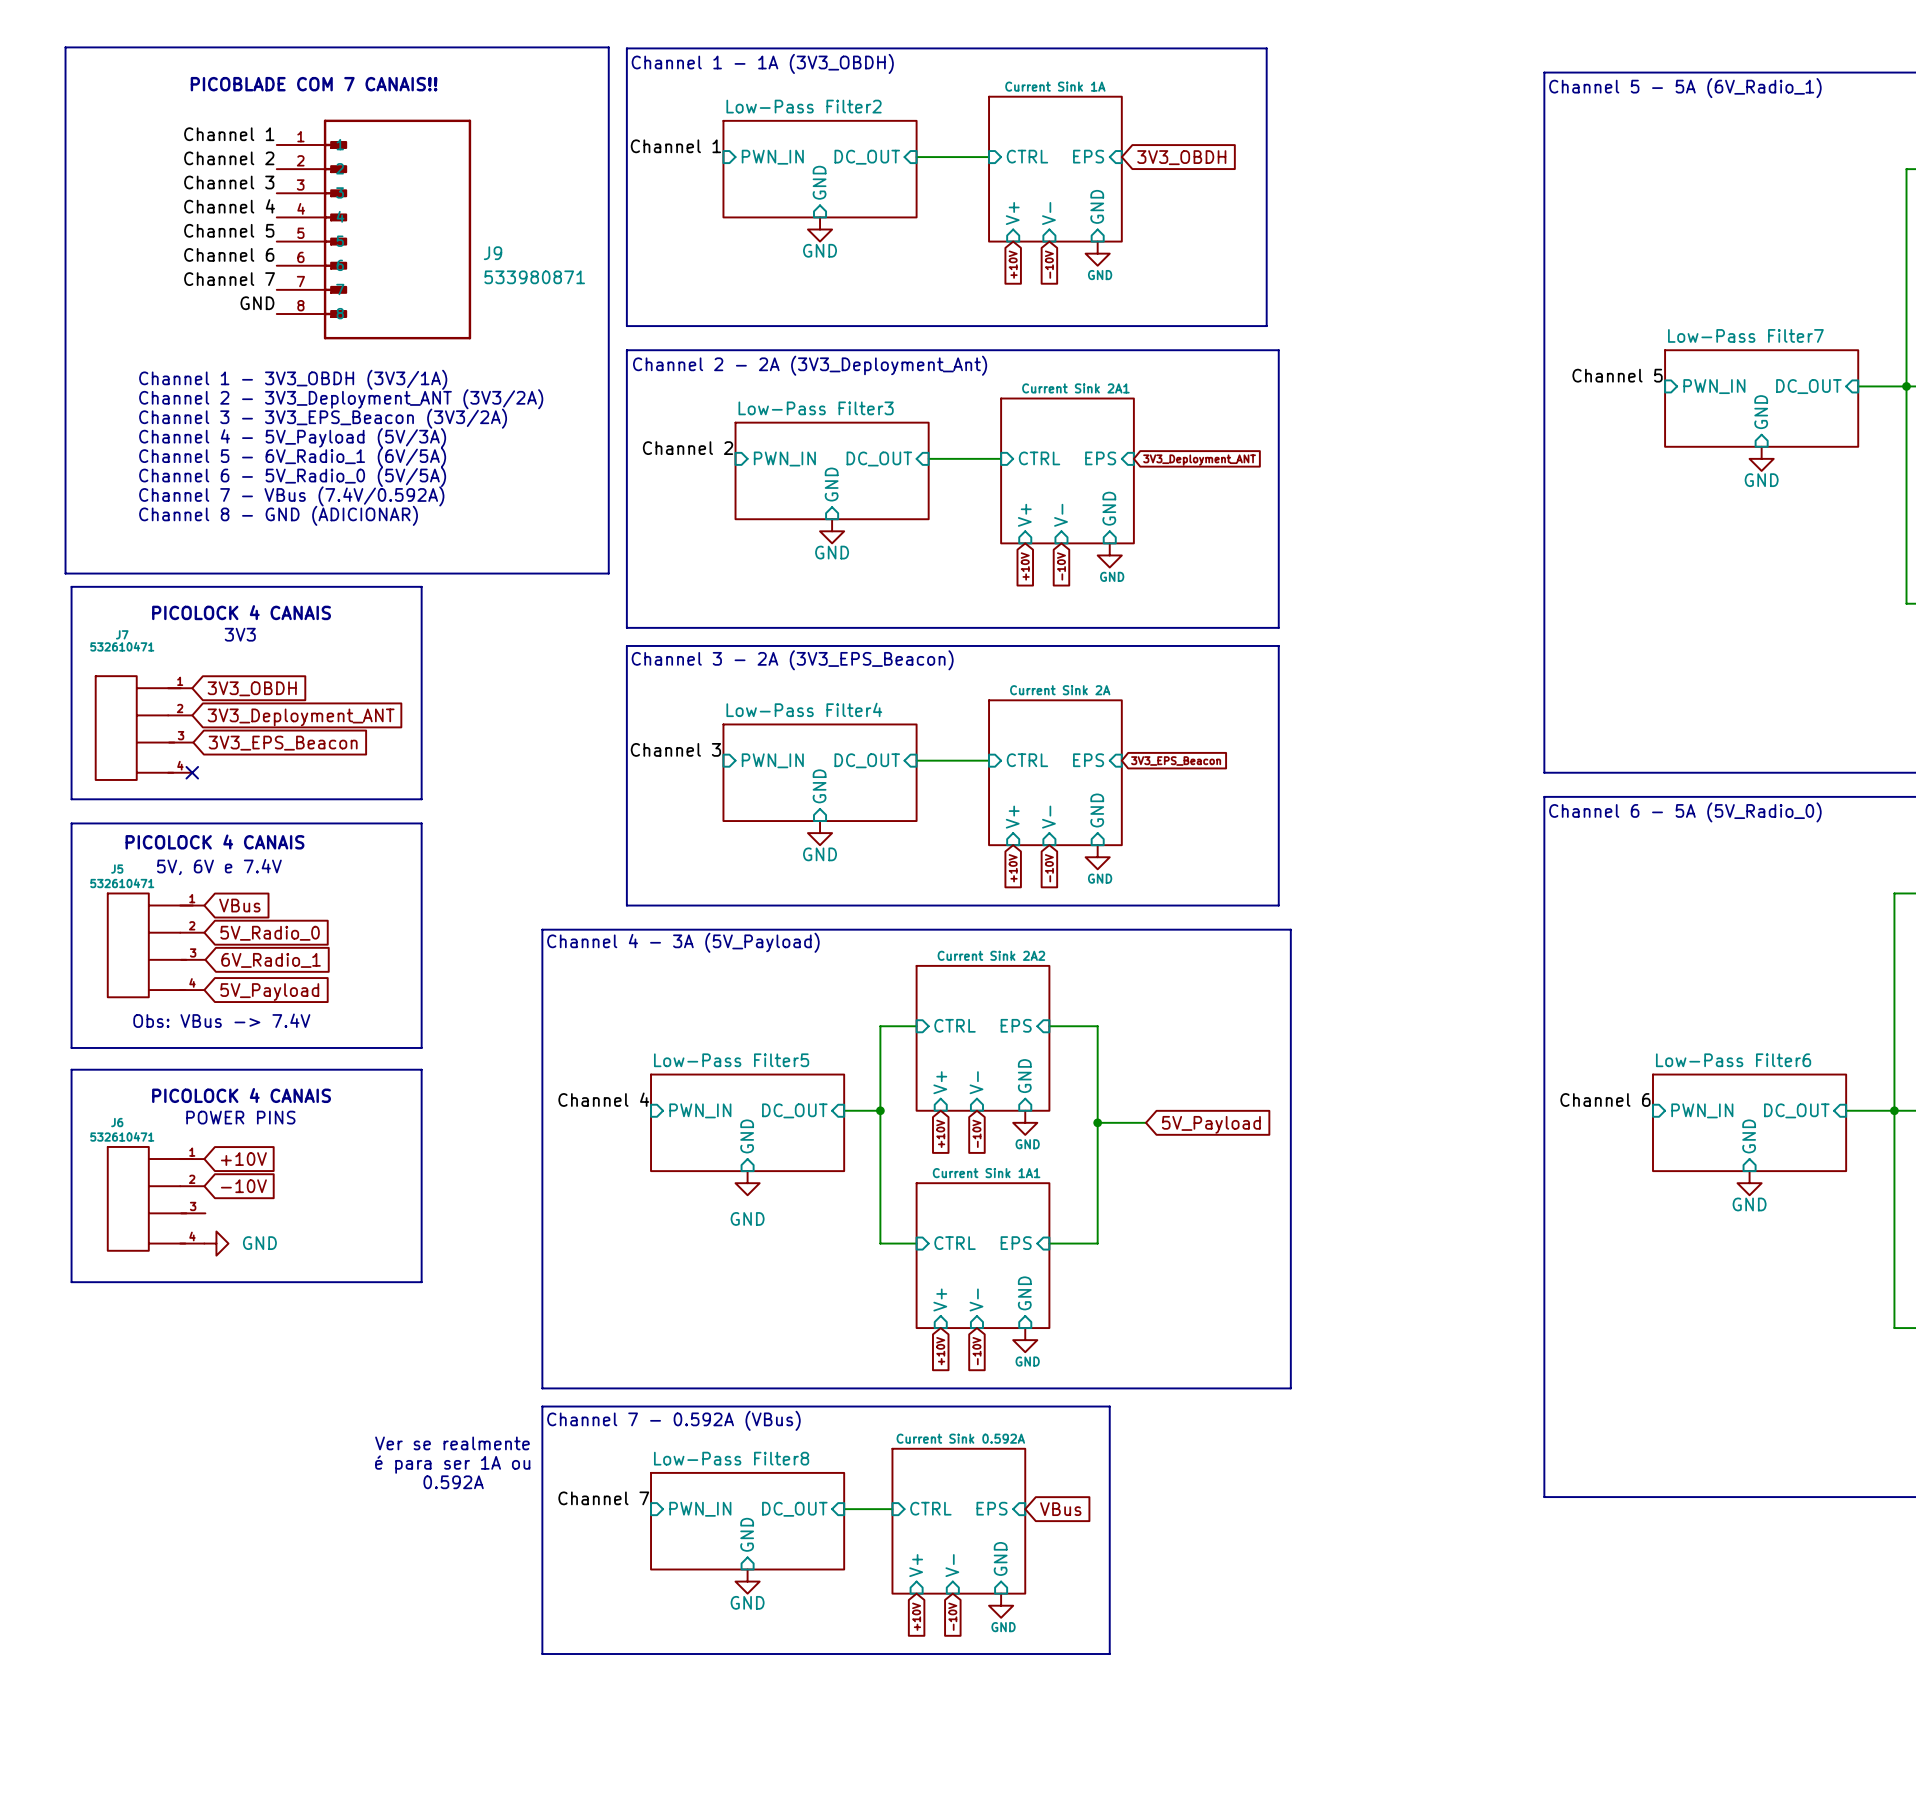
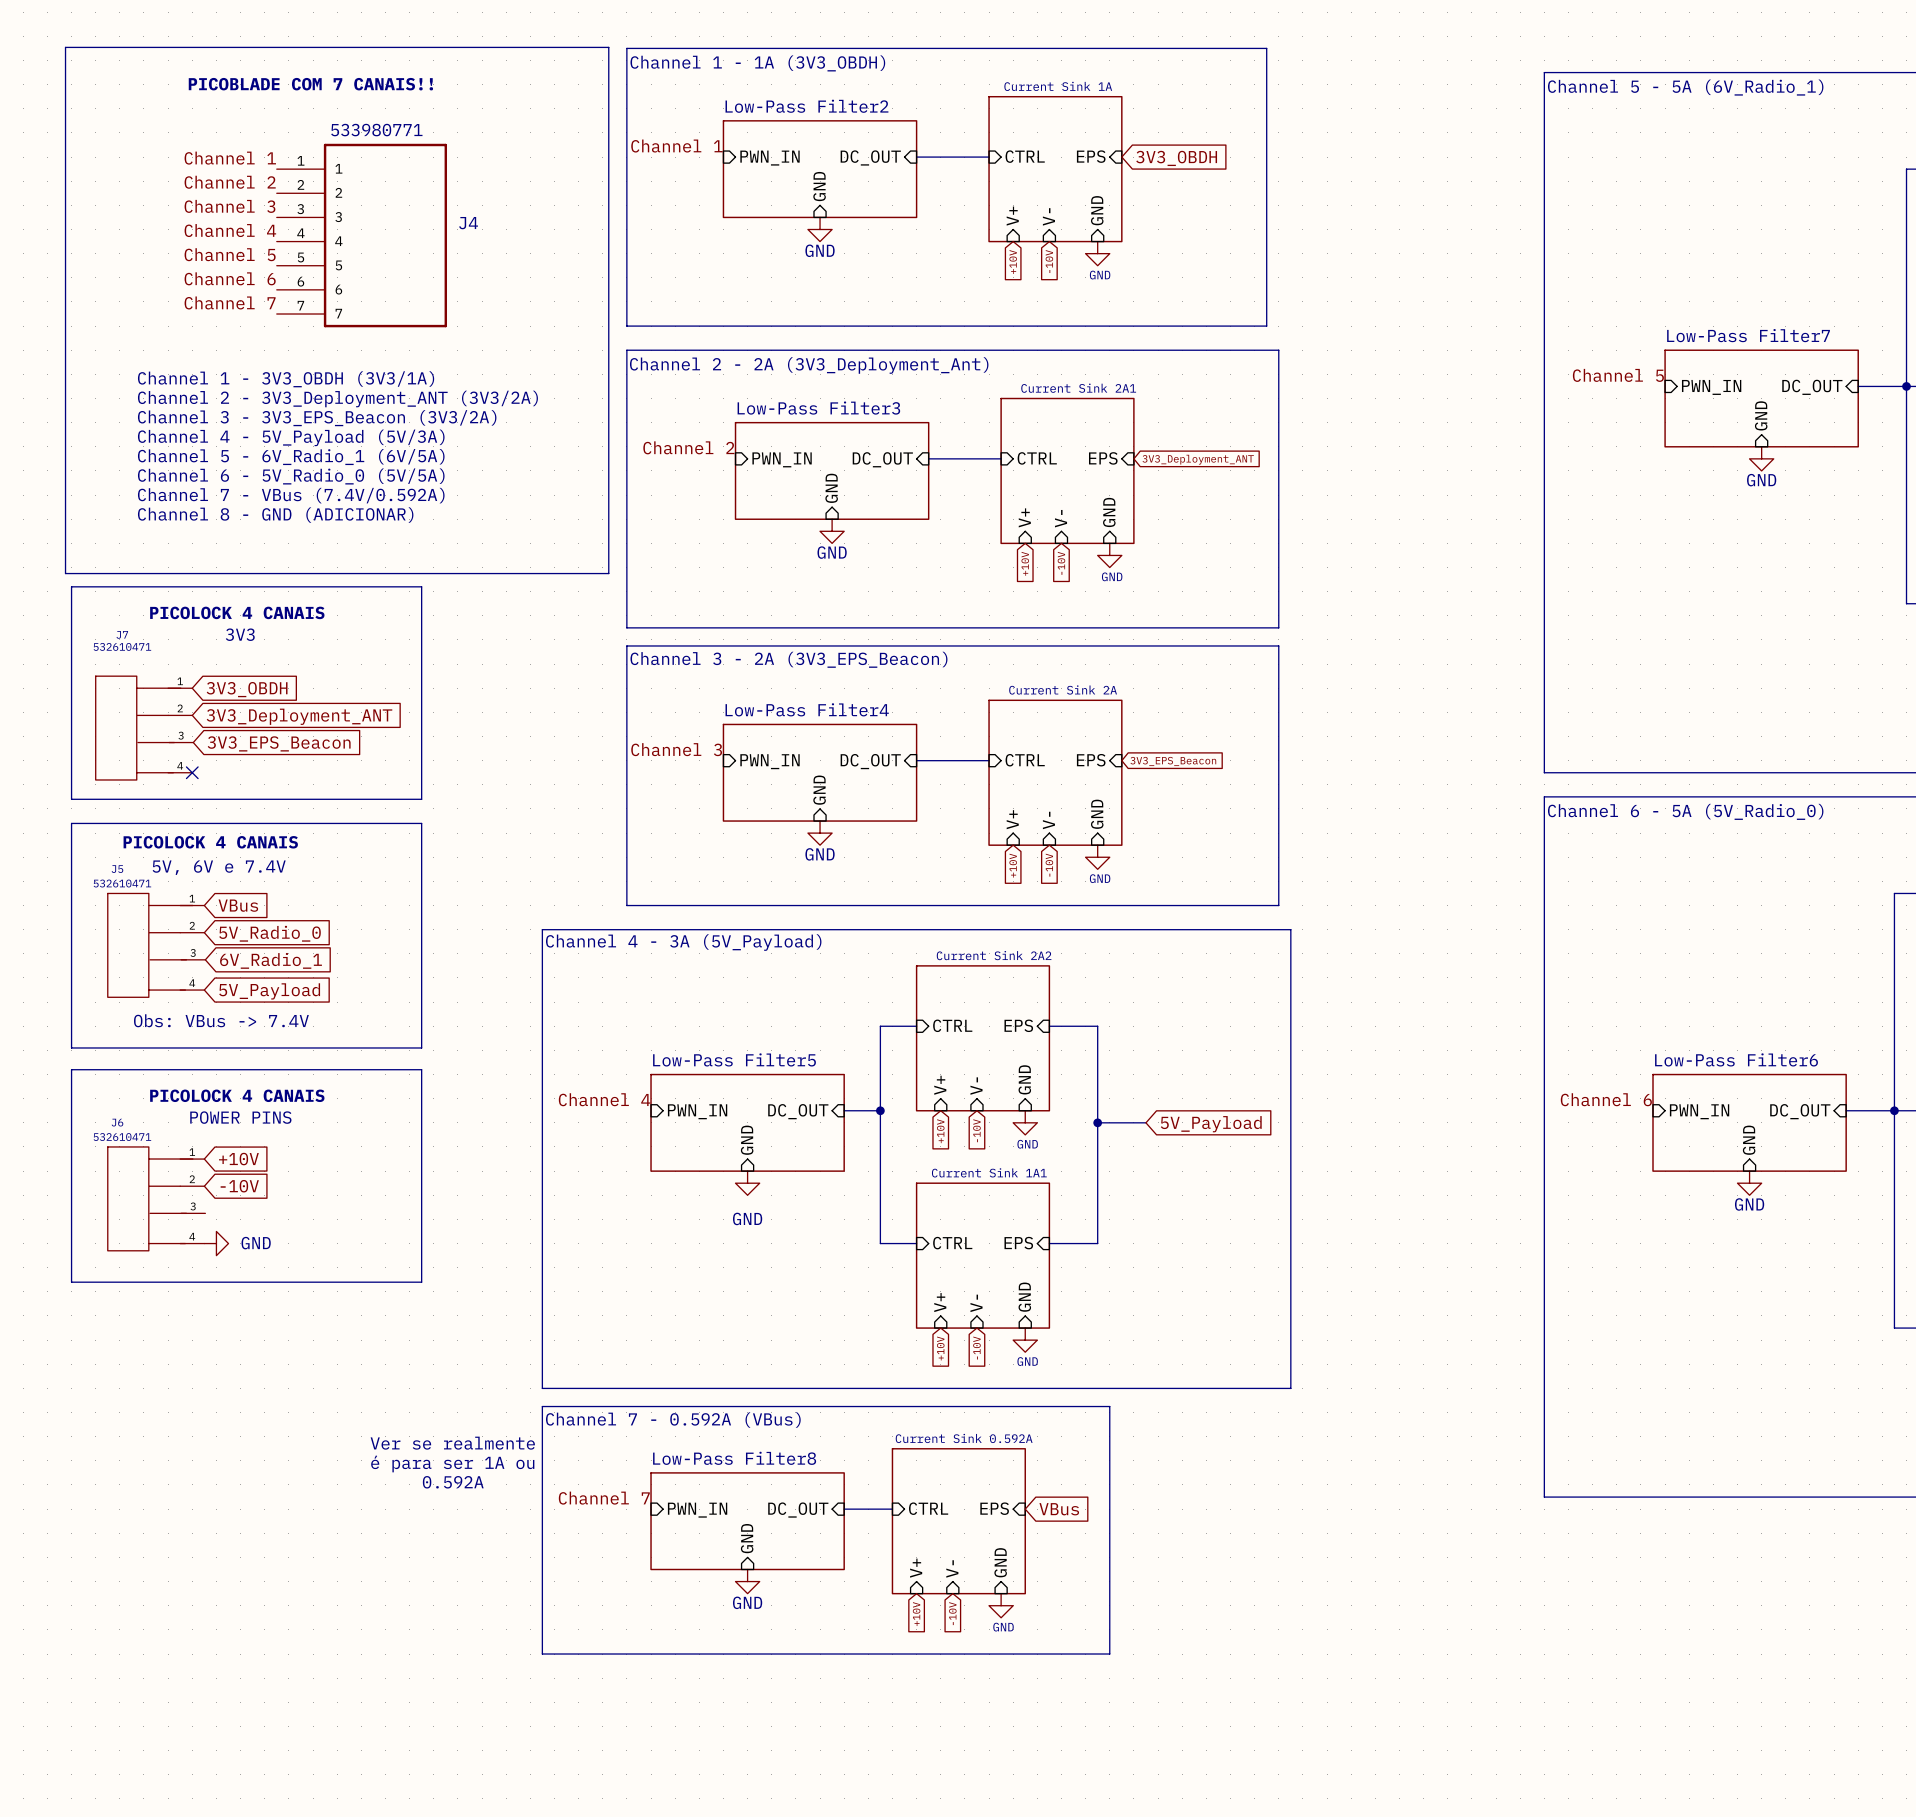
label: Channel 1 (229, 134) -> none
label: Channel 2 (229, 158) -> Channel 1 (230, 158)
label: Channel 3 (229, 182) -> Channel 2 (230, 182)
label: Channel 4 (229, 206) -> Channel 3 (229, 206)
J9: 533980871 (373, 229) -> none
label: Channel 5 (229, 230) -> Channel 4 (230, 230)
J4: none -> 533980771 (361, 235)
label: Channel 6 (229, 254) -> Channel 5 (230, 254)
label: Channel 7 (229, 279) -> Channel 6 (230, 278)
label: GND (257, 303) -> Channel 7 (230, 302)

